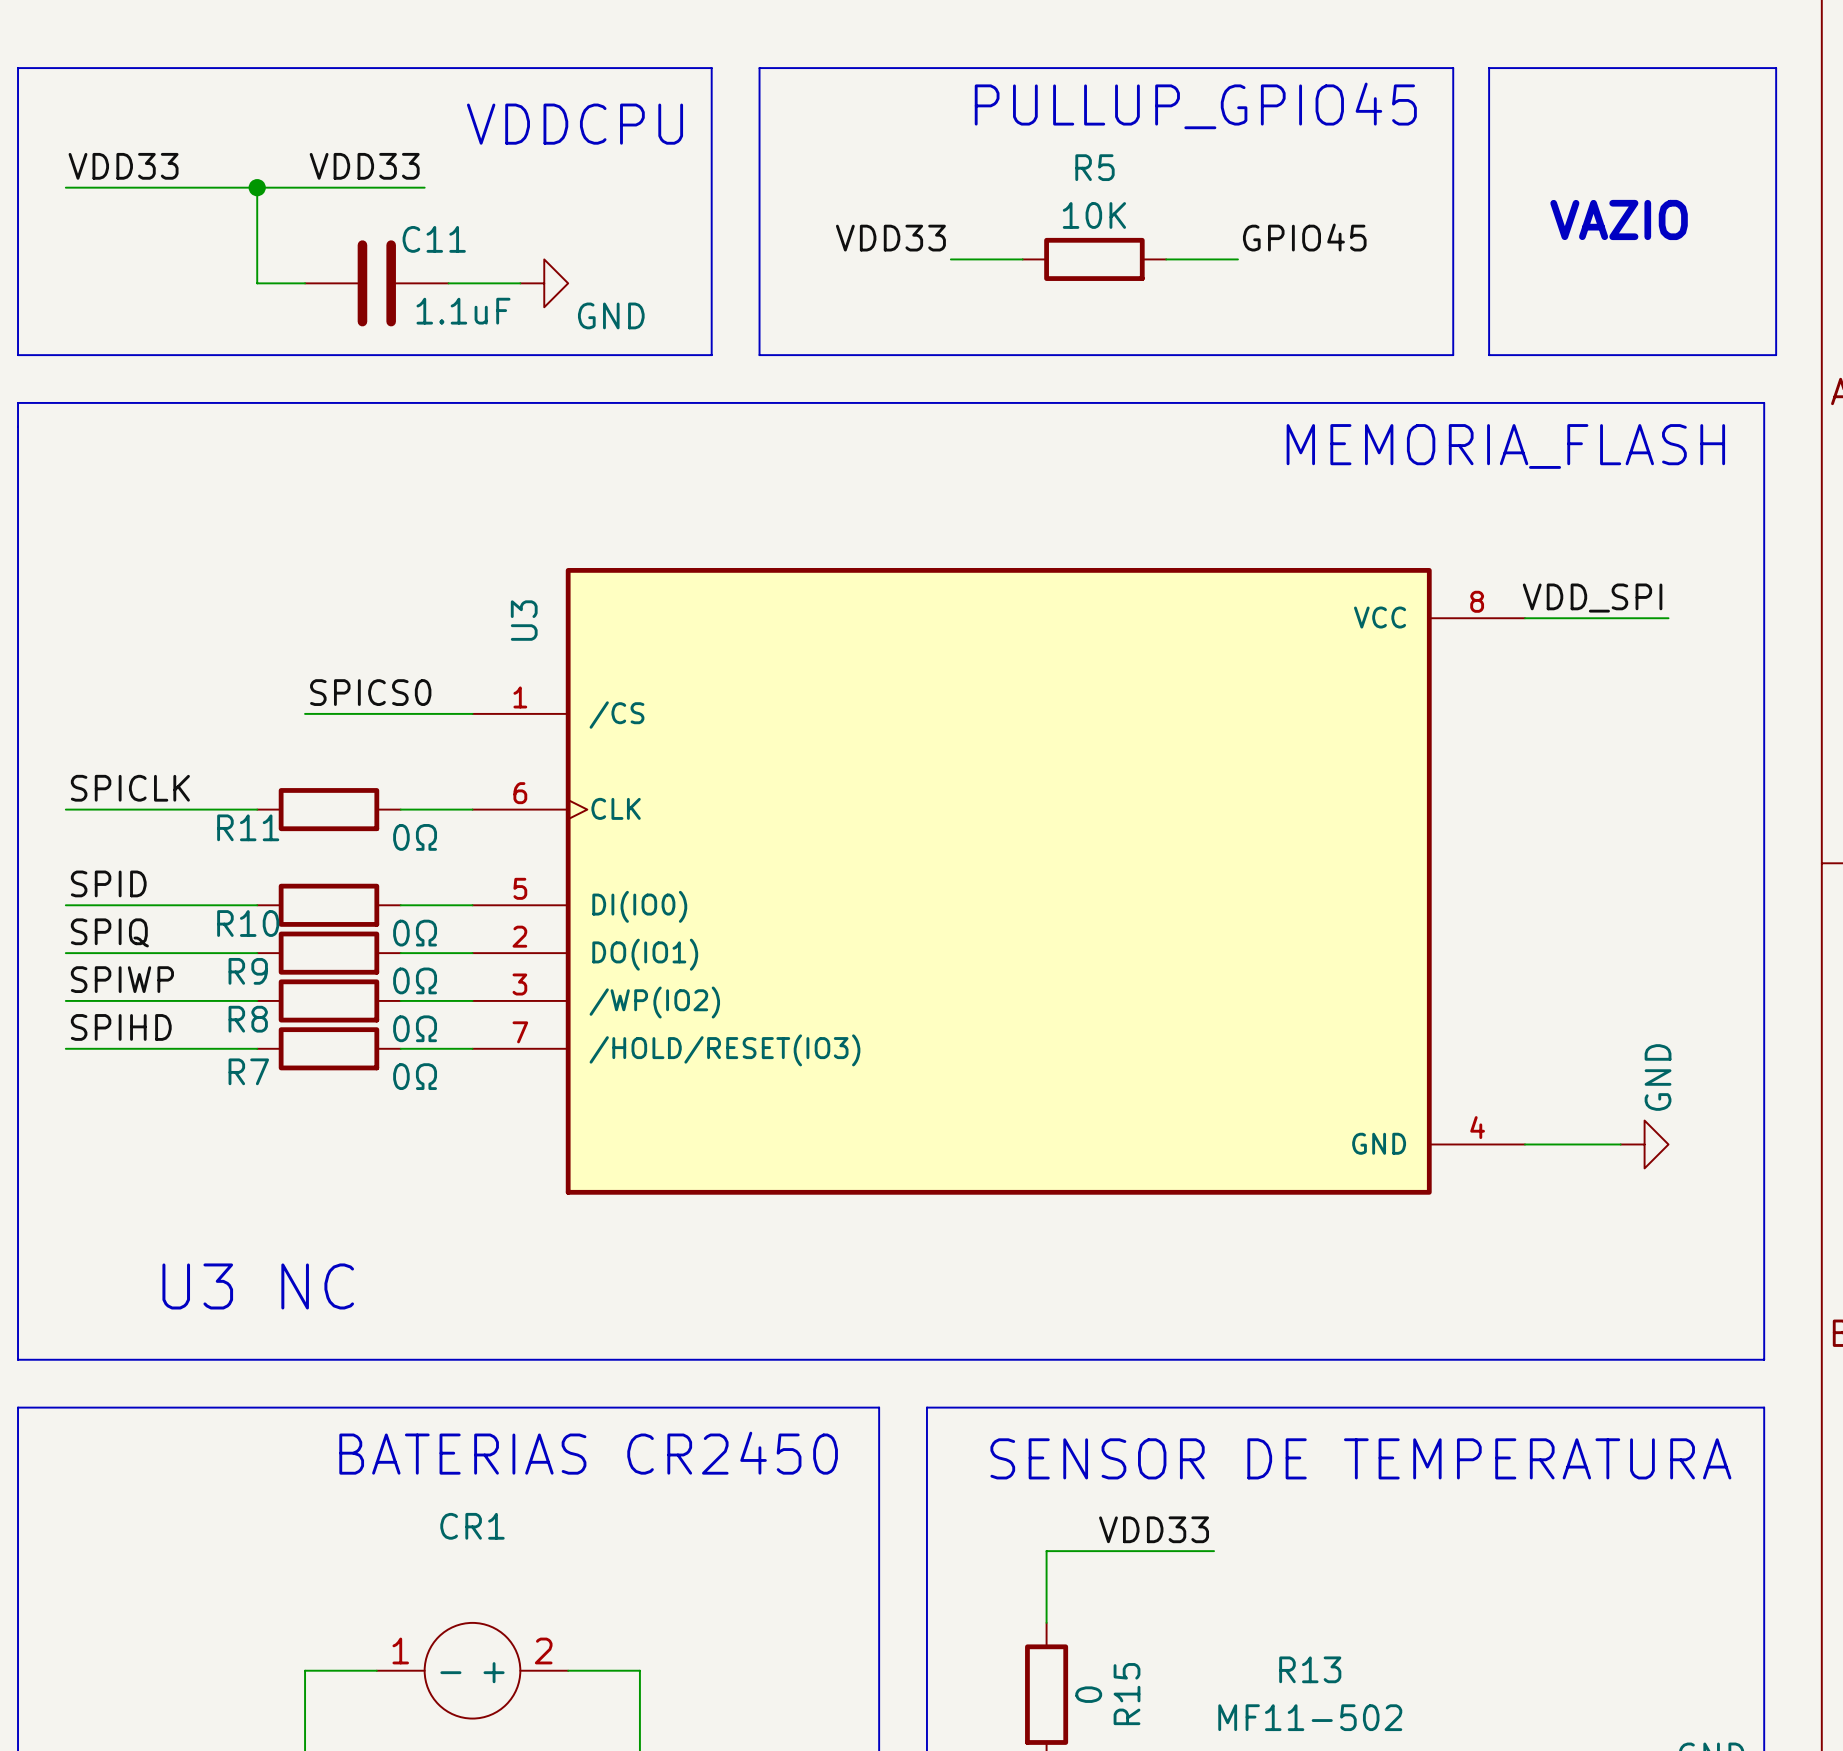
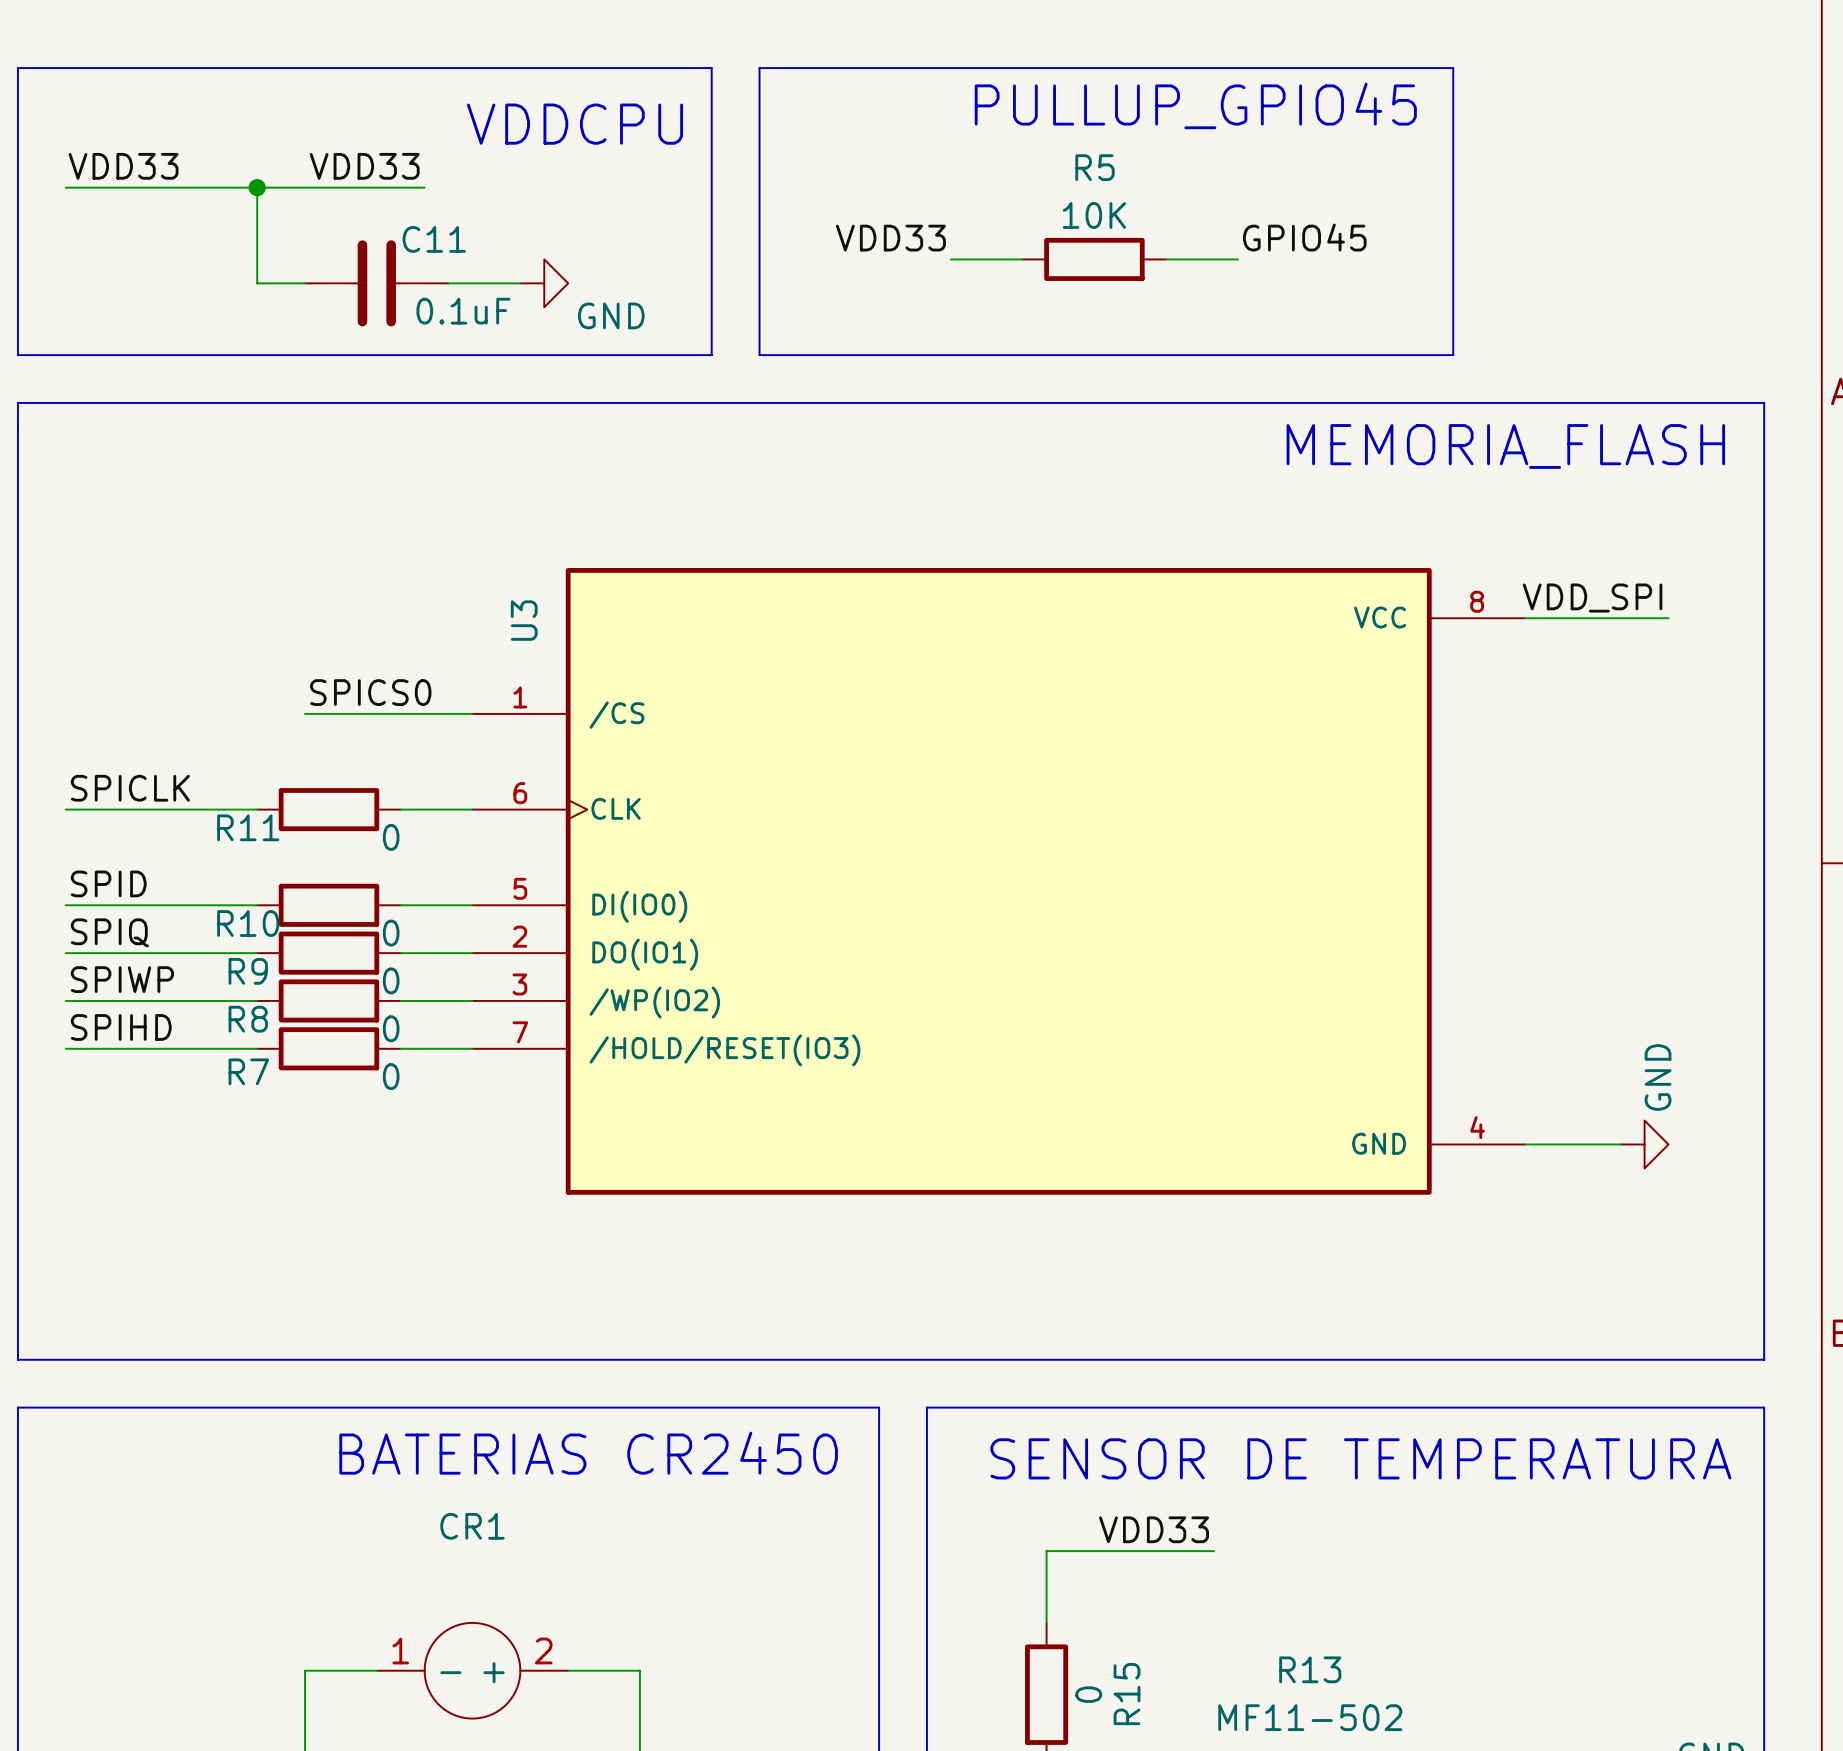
line: (1489, 68) (1776, 68) (1776, 355) (1489, 355) (1489, 68) -> none
text: VAZIO (1619, 219) -> none
C11 value: 1.1uF (463, 311) -> 0.1uF (463, 311)
R11 value: 0Ω (415, 837) -> 0 (391, 837)
R10 value: 0Ω (415, 933) -> 0 (391, 933)
R9 value: 0Ω (415, 980) -> 0 (391, 980)
R8 value: 0Ω (415, 1028) -> 0 (391, 1028)
R7 value: 0Ω (415, 1076) -> 0 (391, 1076)
text: U3 NC (258, 1286) -> none

